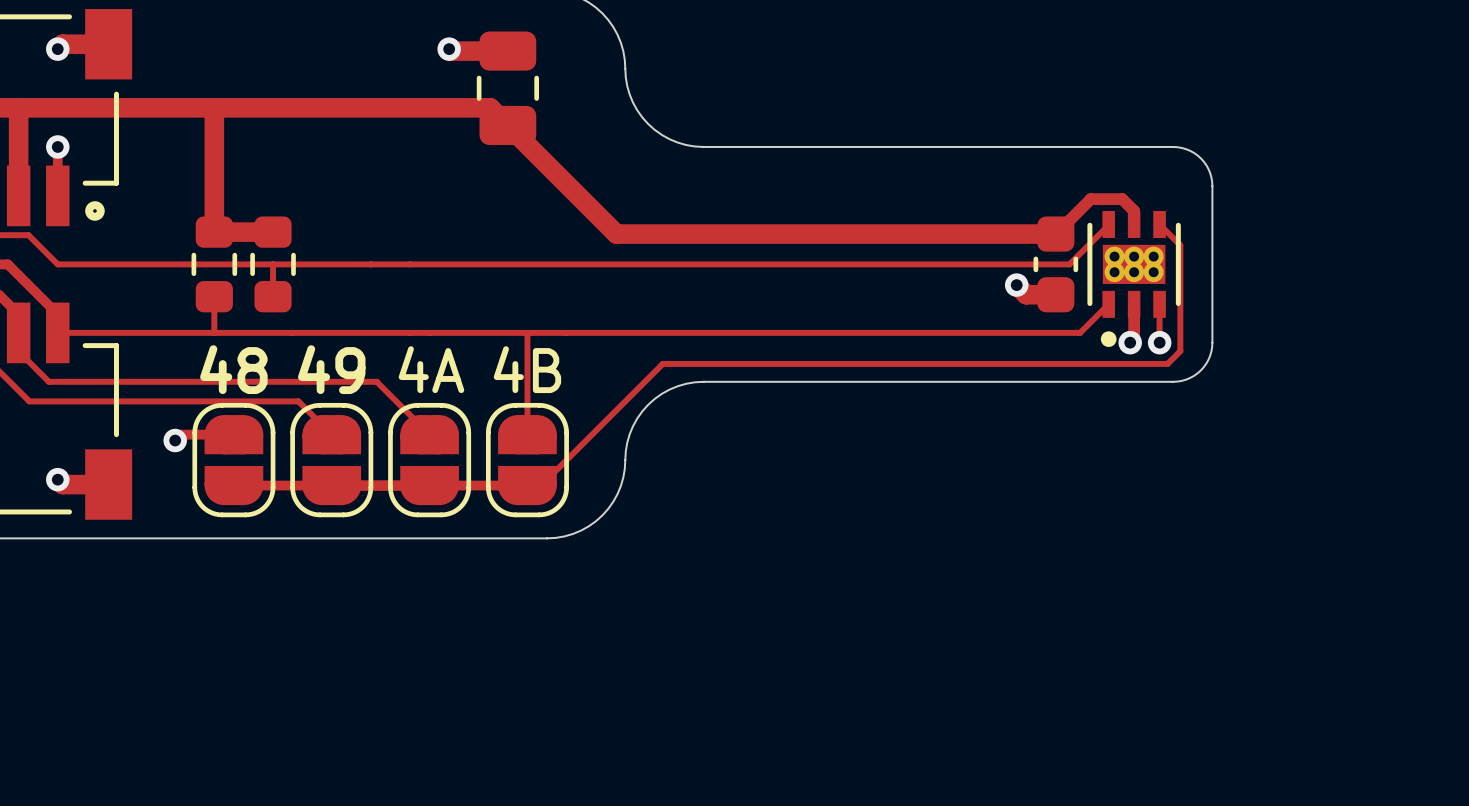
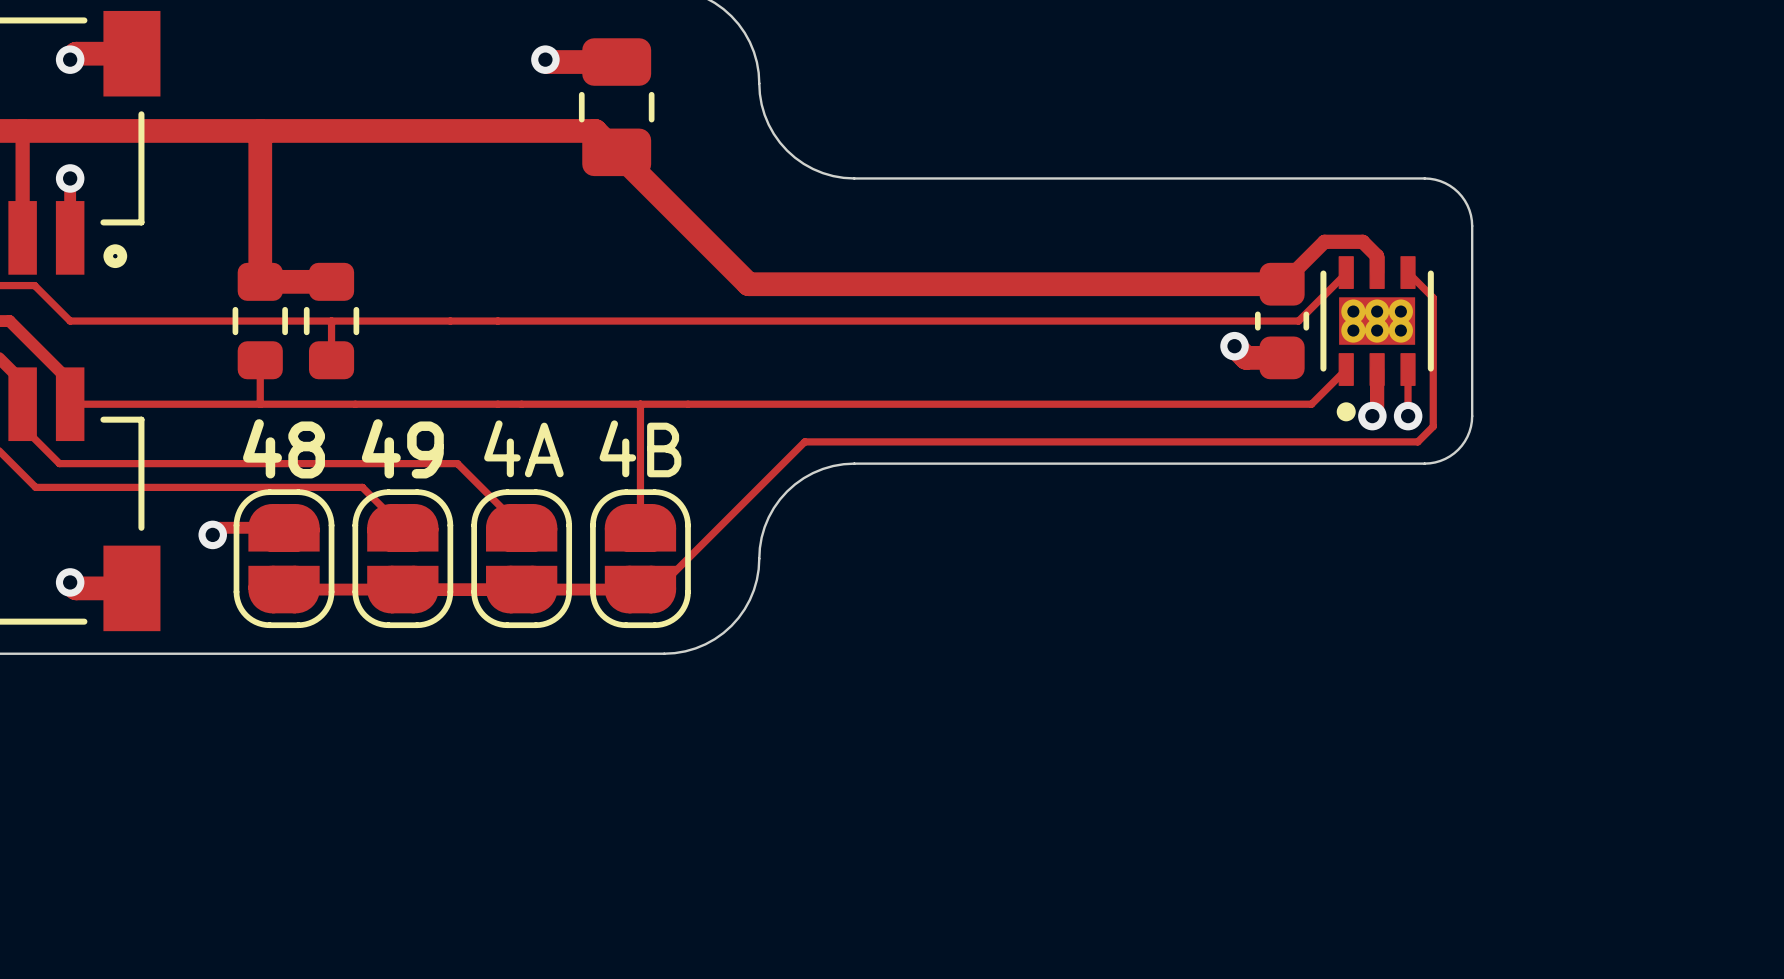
track width: thick (18, 107) (18, 195) -> thin (22, 130) (22, 237)

